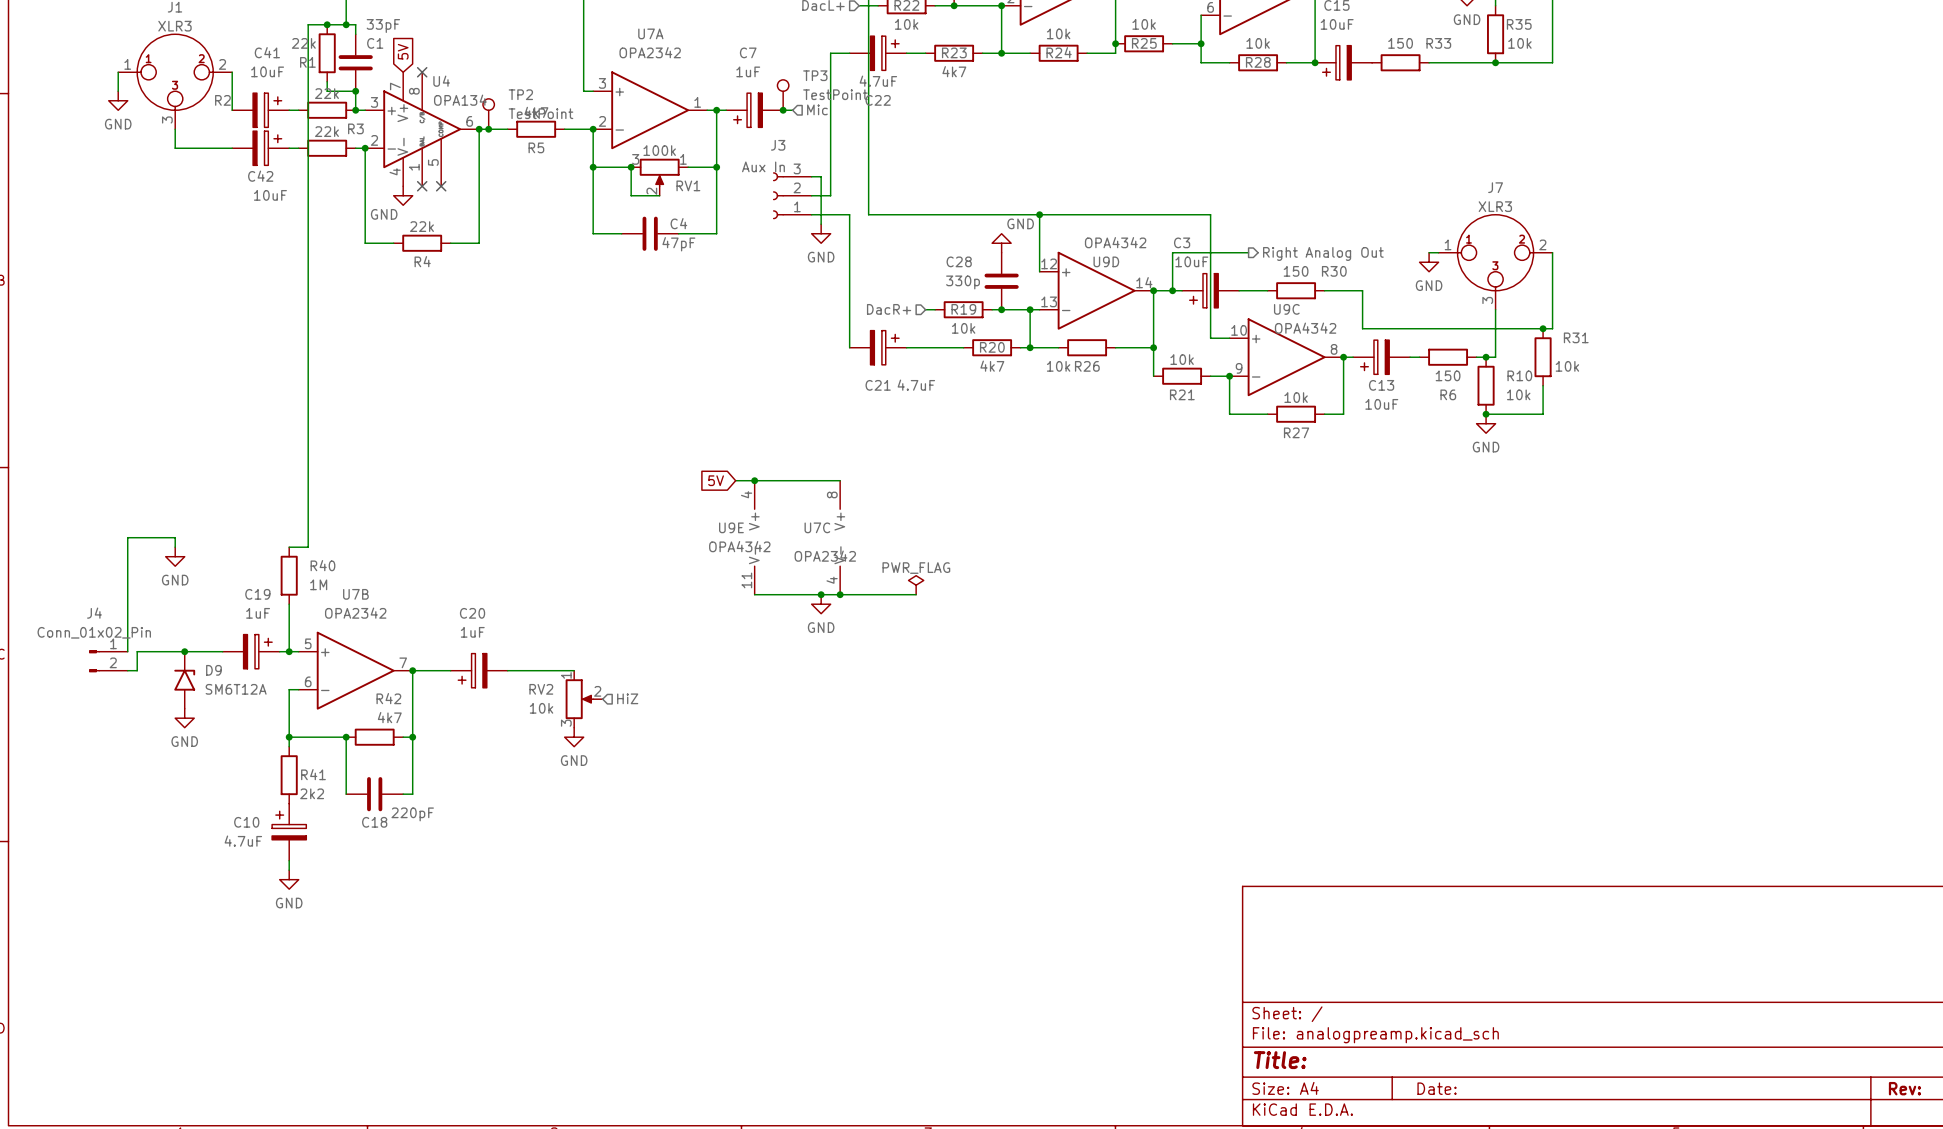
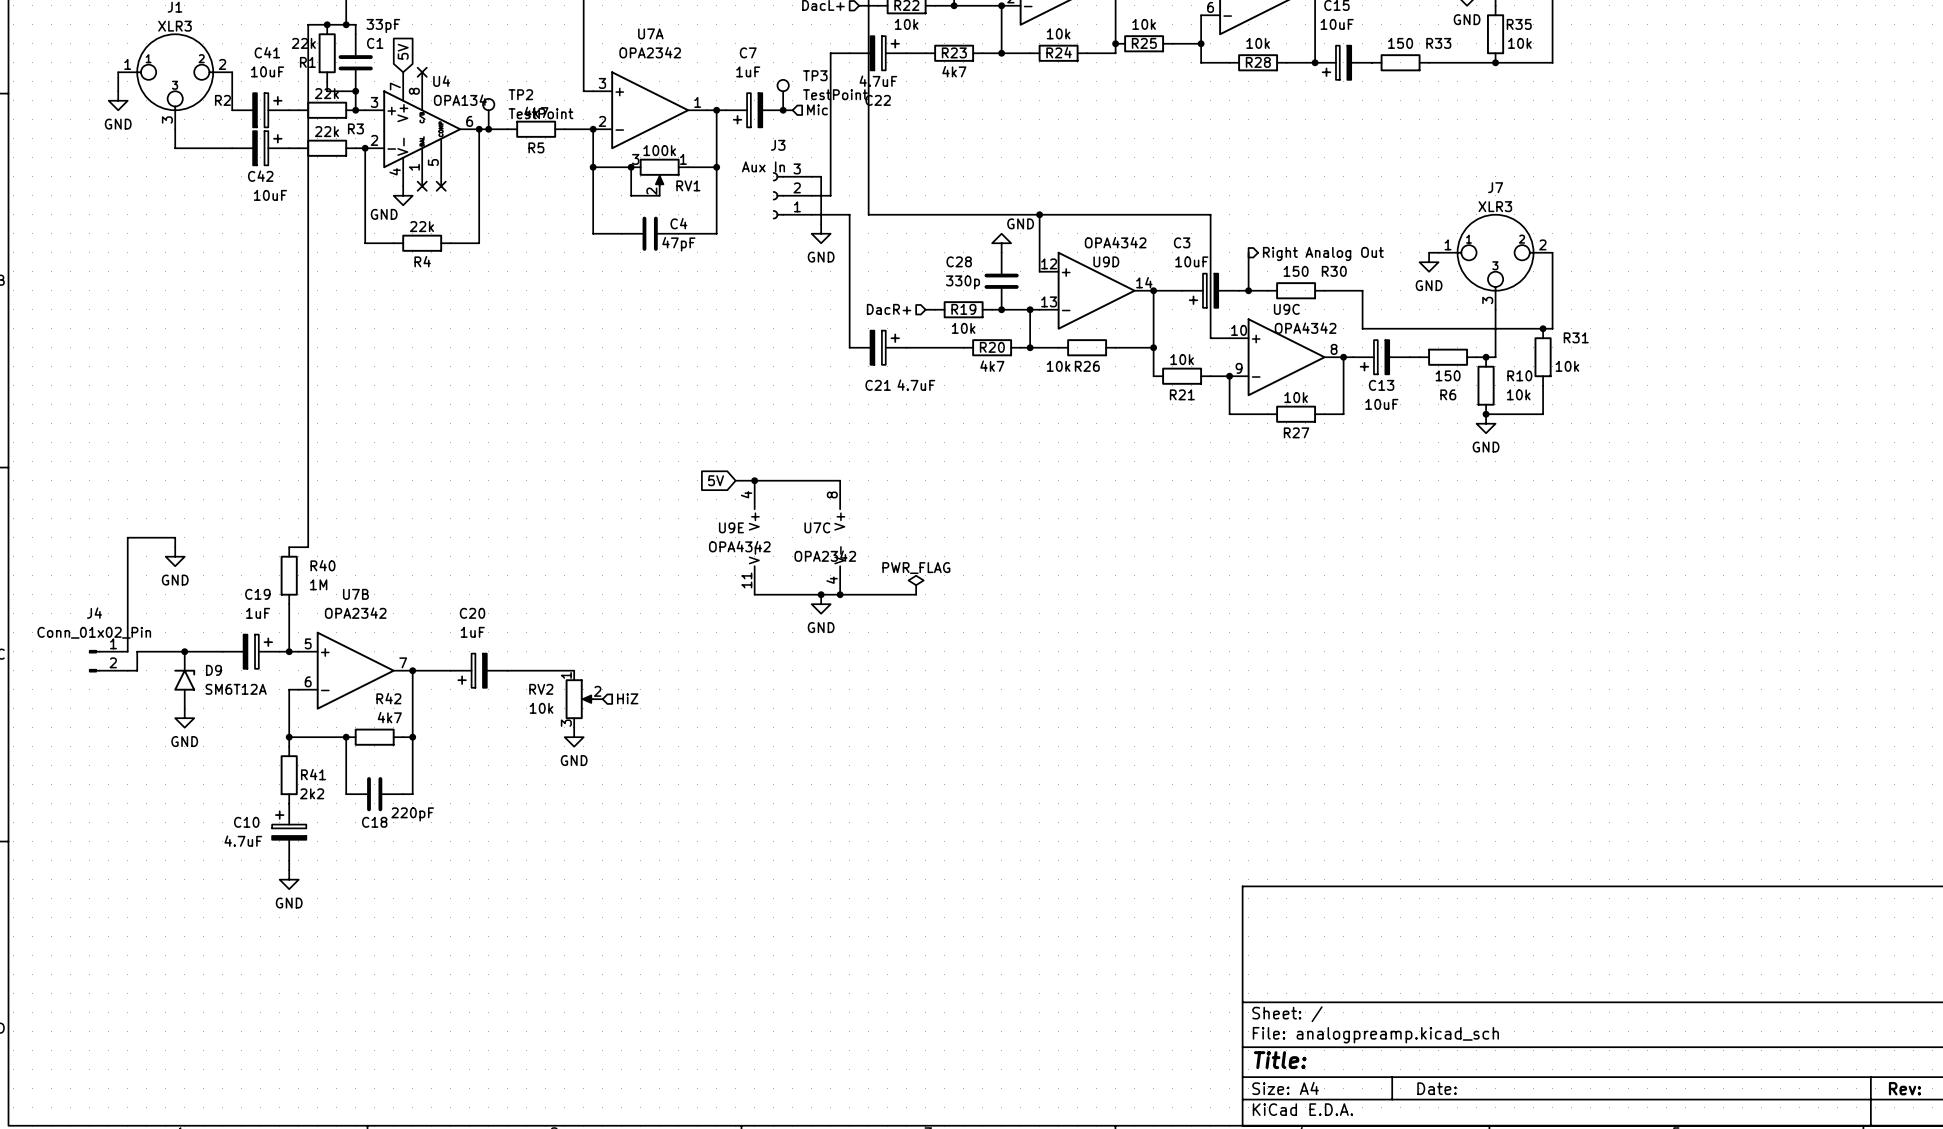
wire: (1248, 252) (1172, 252) (1172, 290) -> (1248, 252) (1248, 290)
junction: (1172, 290) -> none
junction: none -> (1248, 290)

